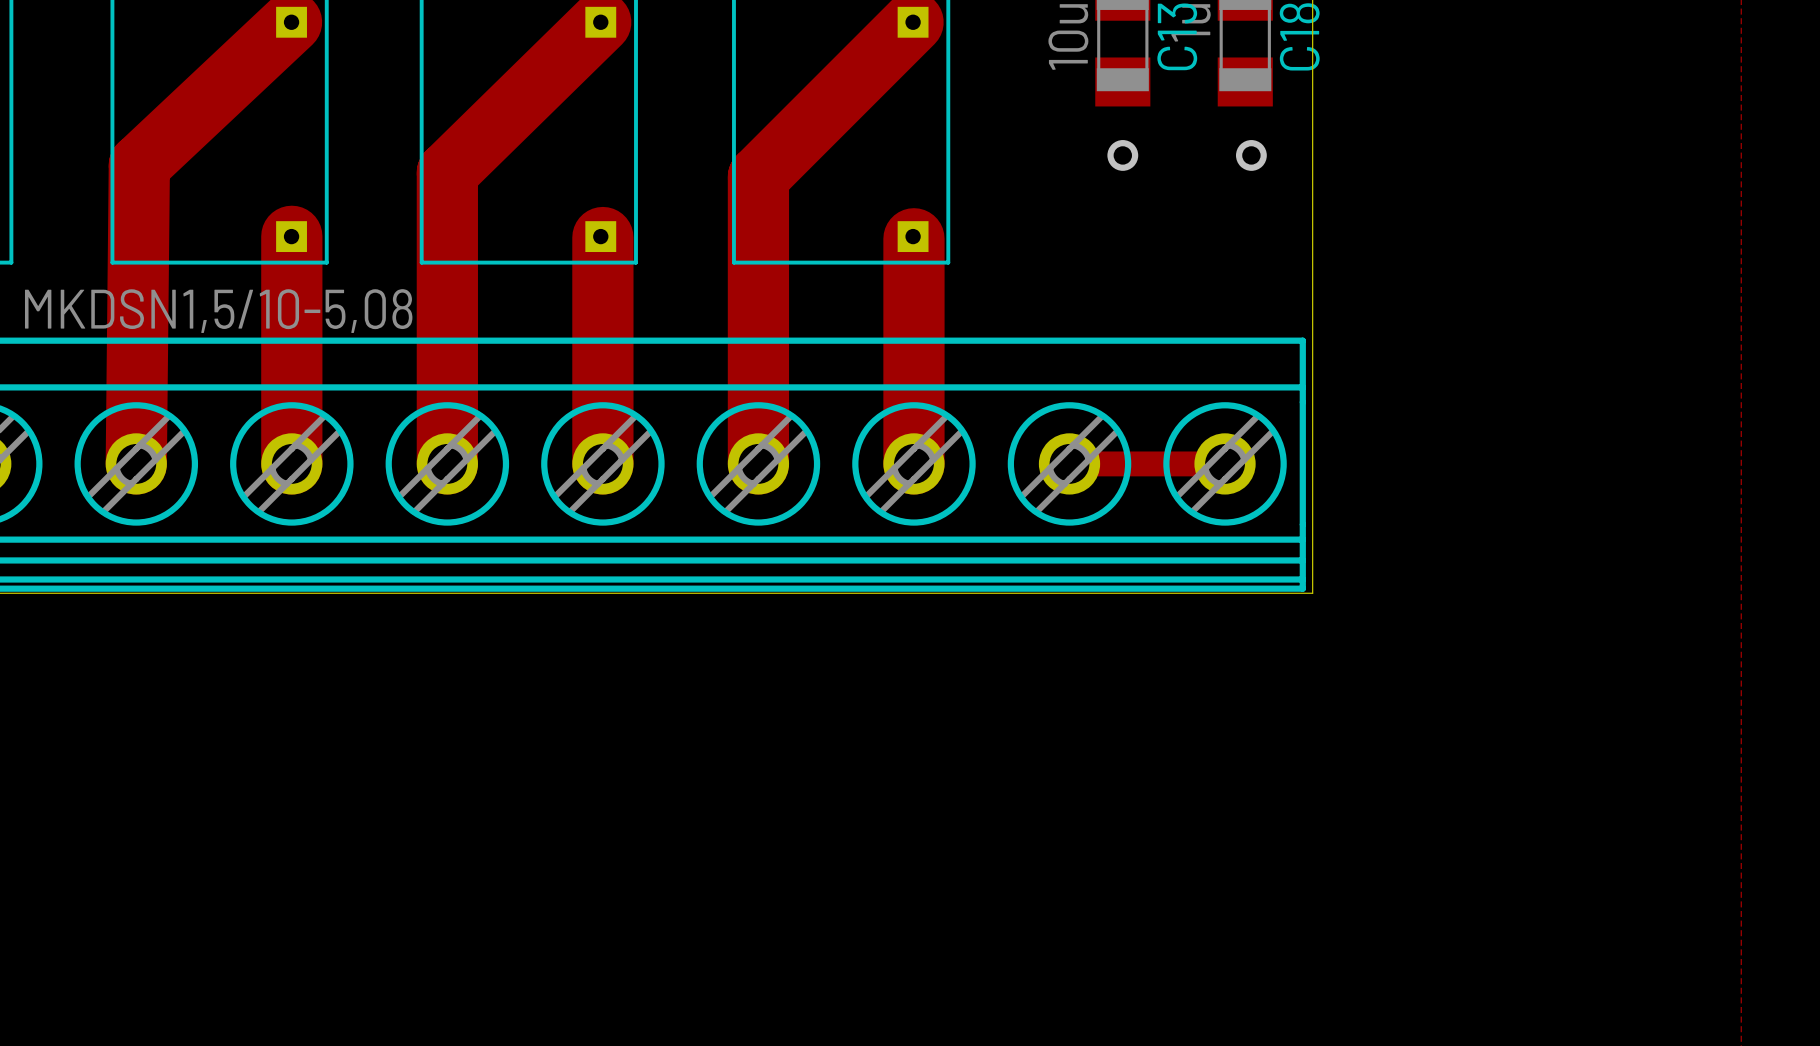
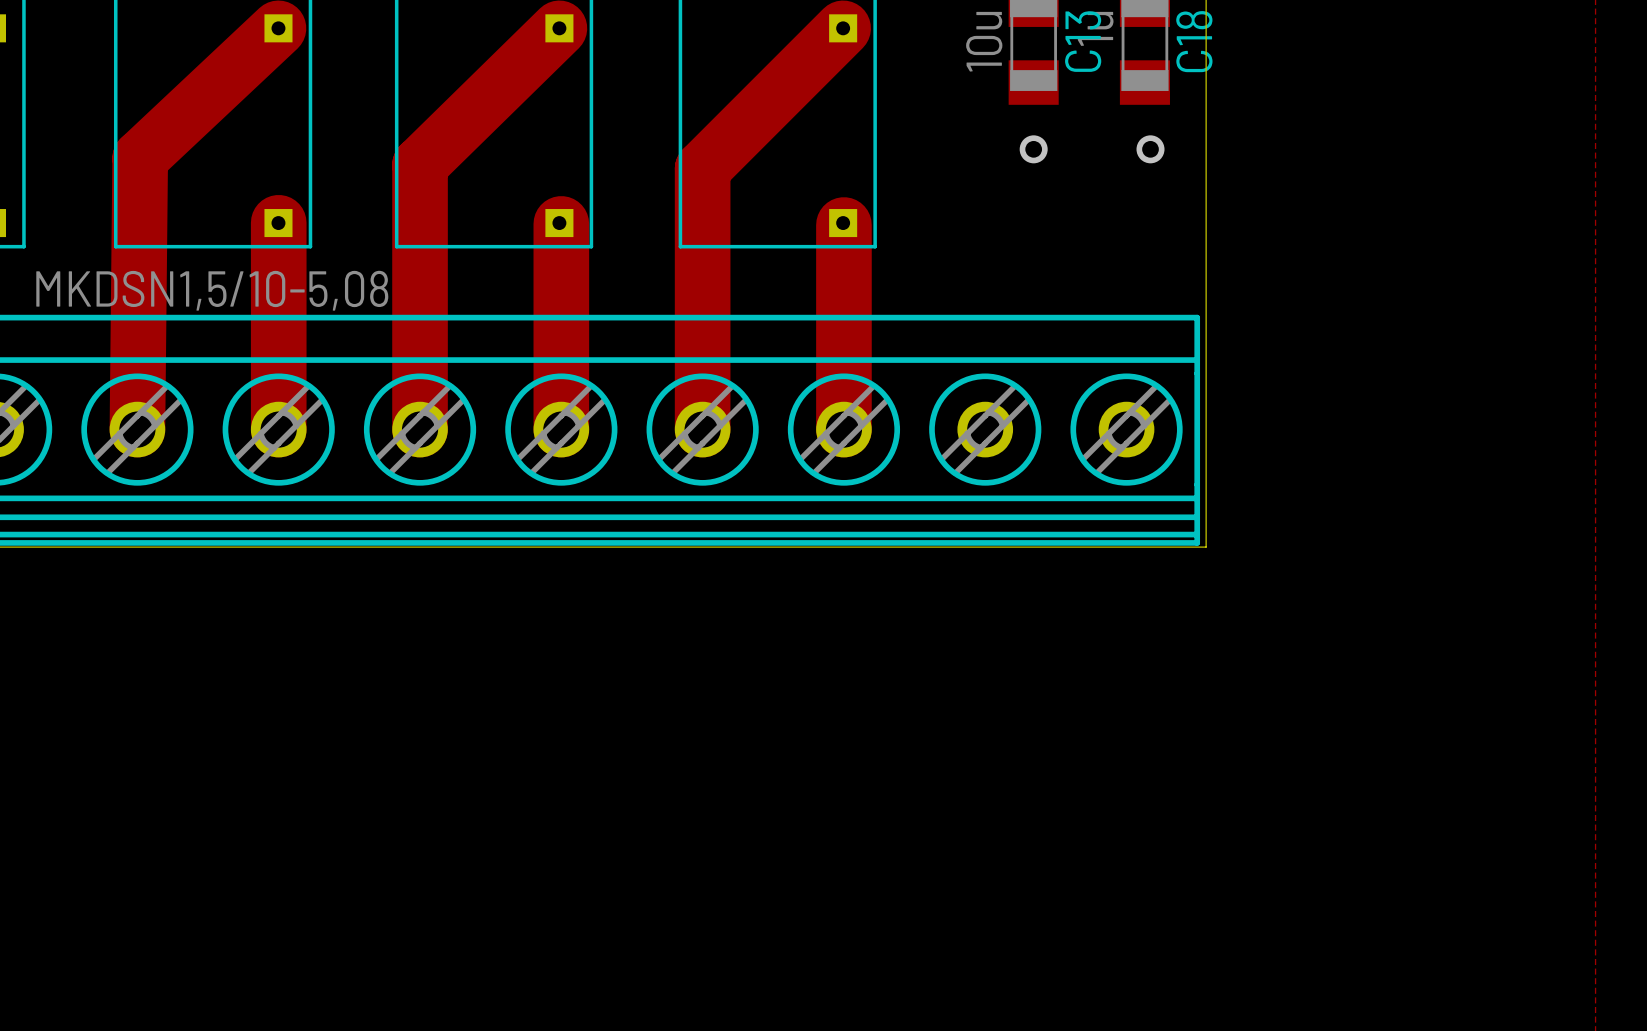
top track: (1069, 463) (1225, 463) -> none

